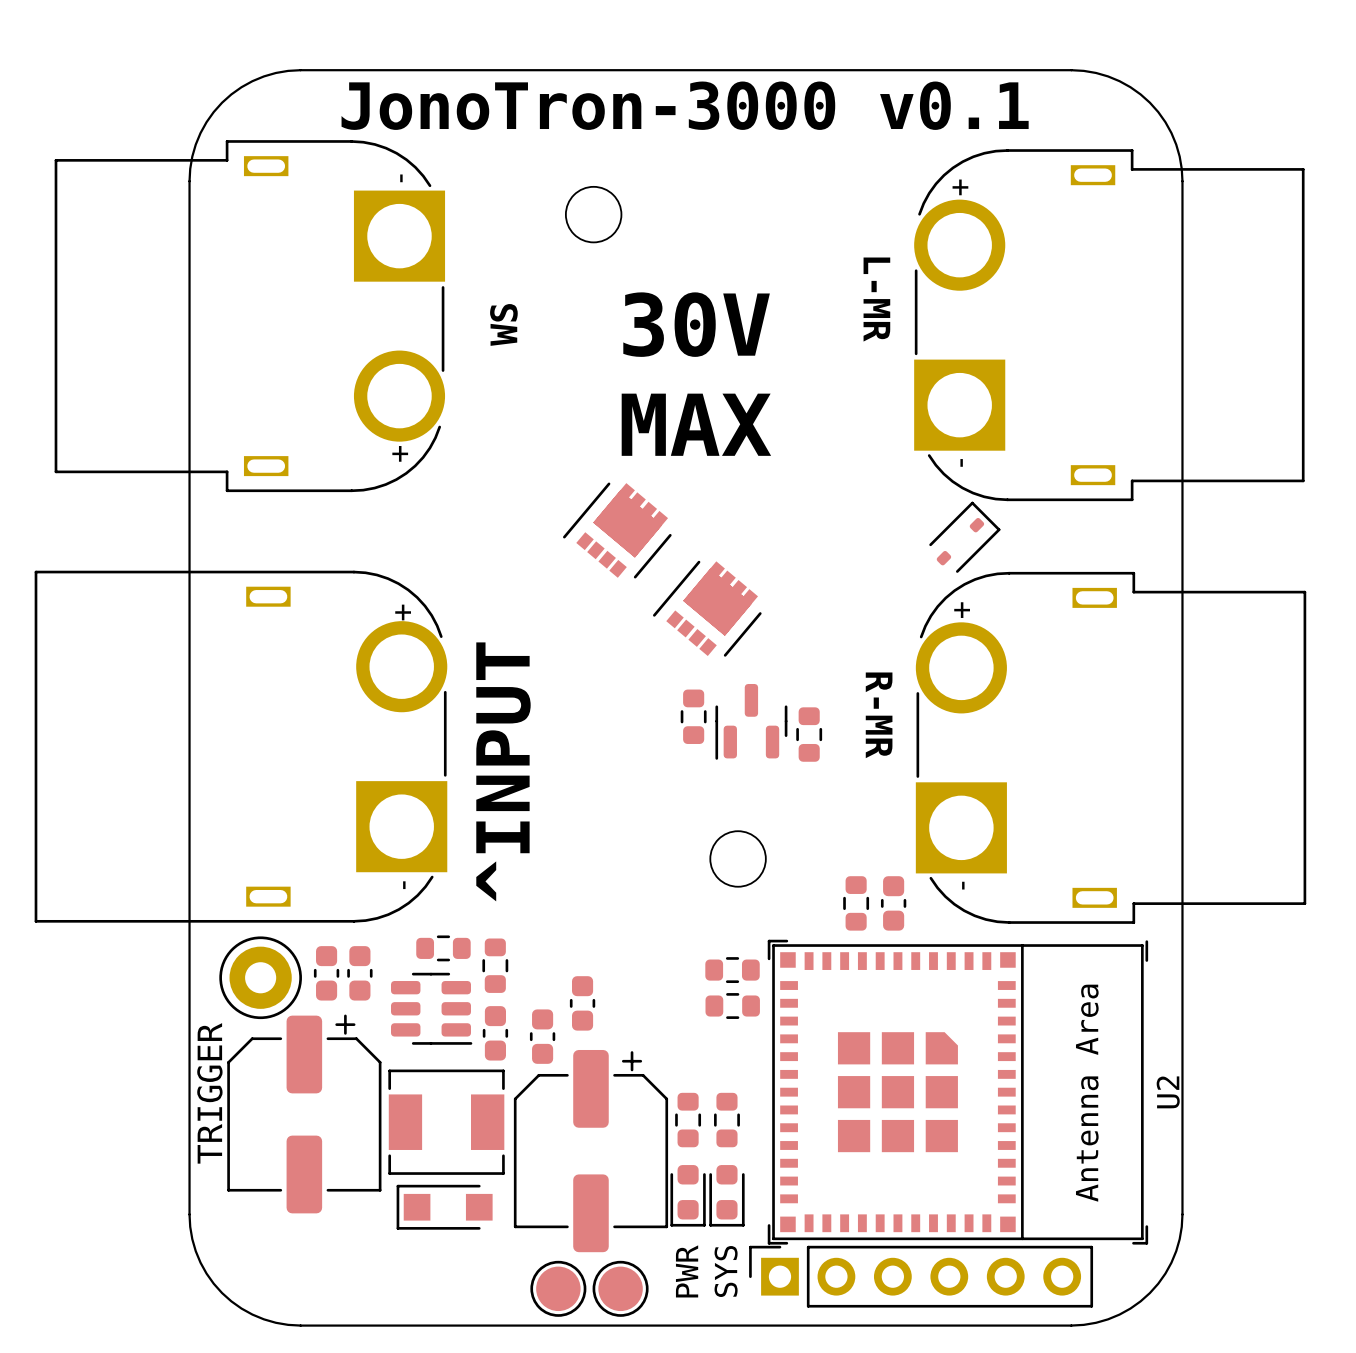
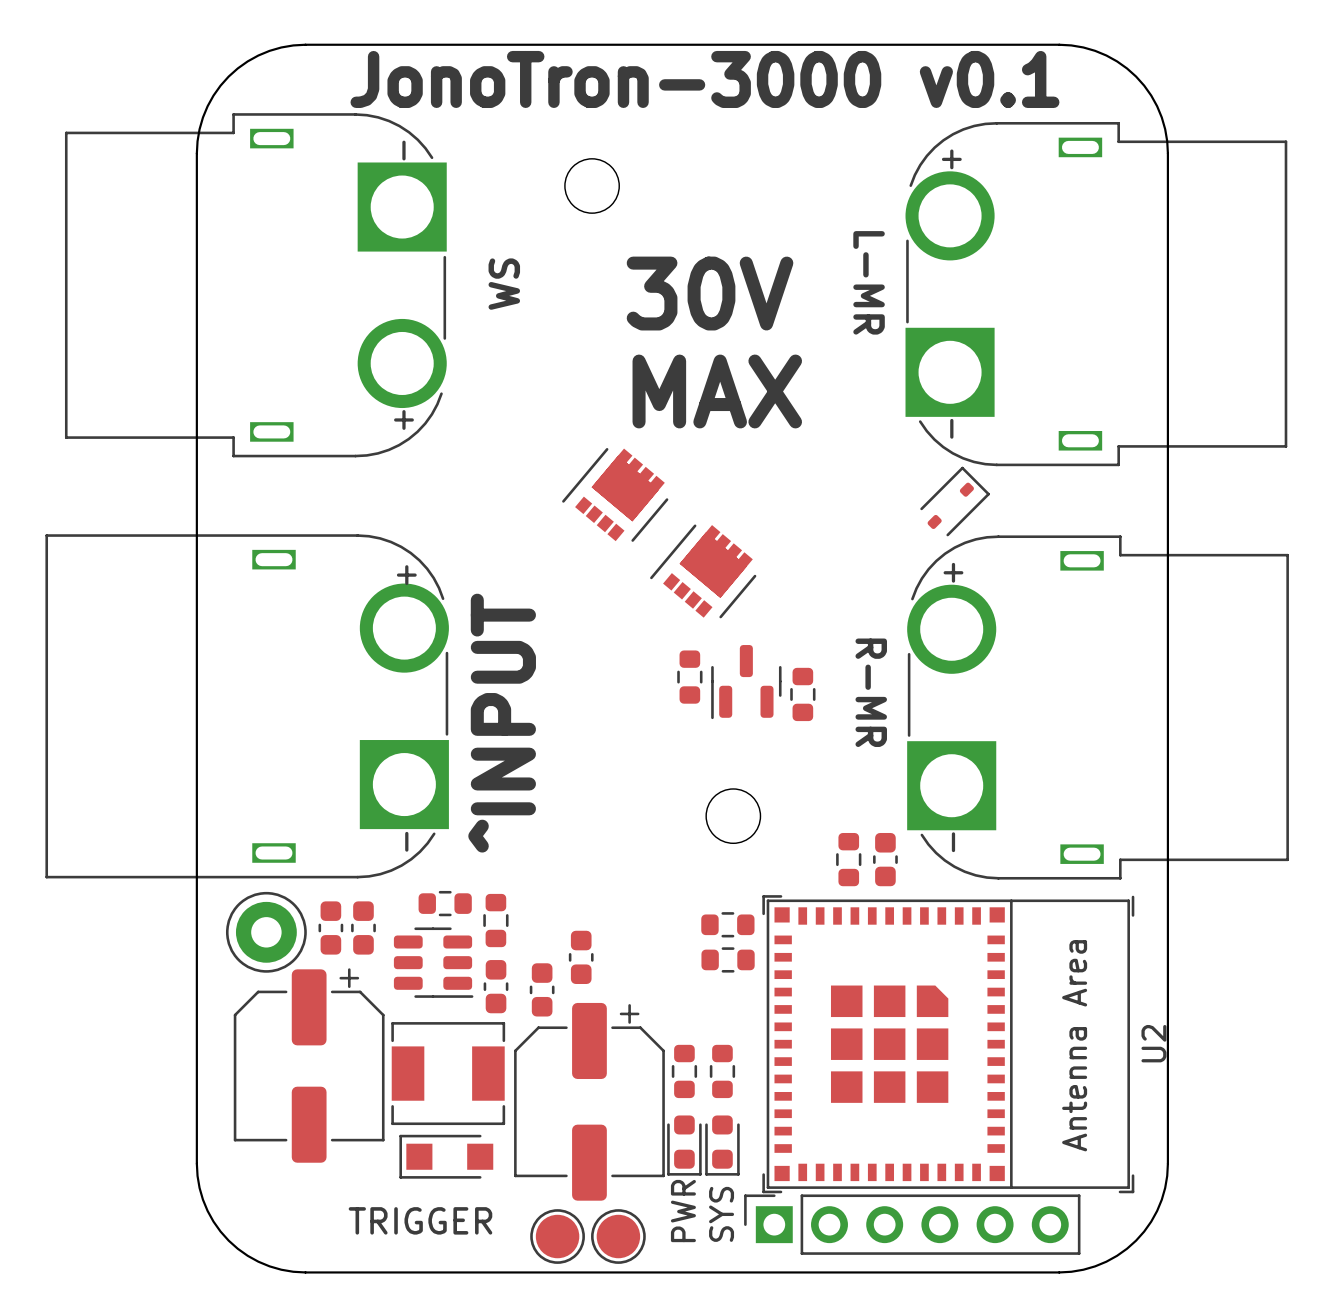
text rotation: 0° (209, 1093) -> 90° clockwise (420, 1220)
text position: TRIGGER (209, 1093) -> TRIGGER (420, 1220)

